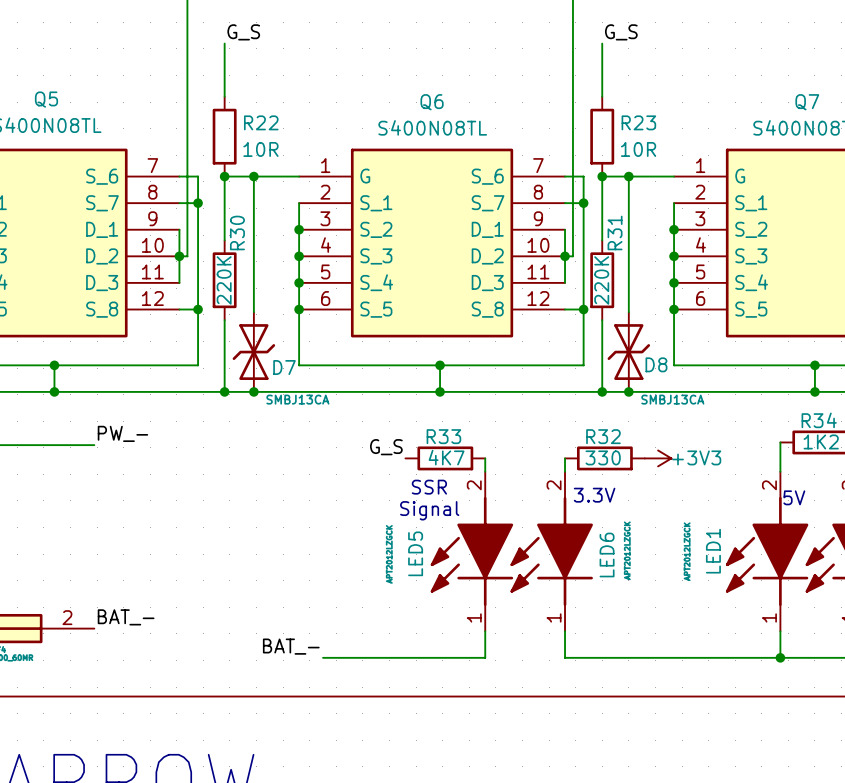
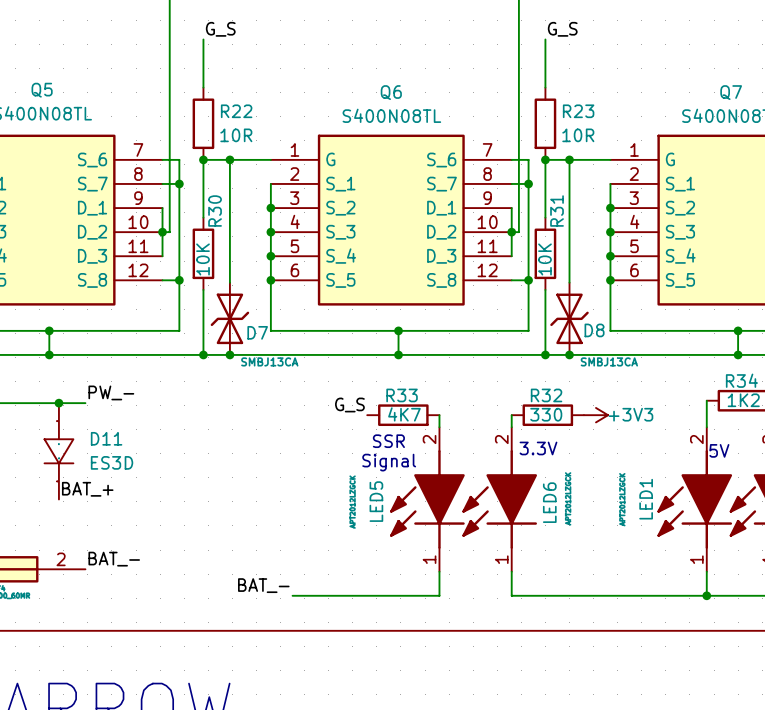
R30 value: 220K (224, 280) -> 10K (203, 259)
R31 value: 220K (601, 280) -> 10K (544, 259)
junction: none -> (58, 403)
D11: none -> ES3D (58, 451)
label: none -> BAT_+ (87, 489)

